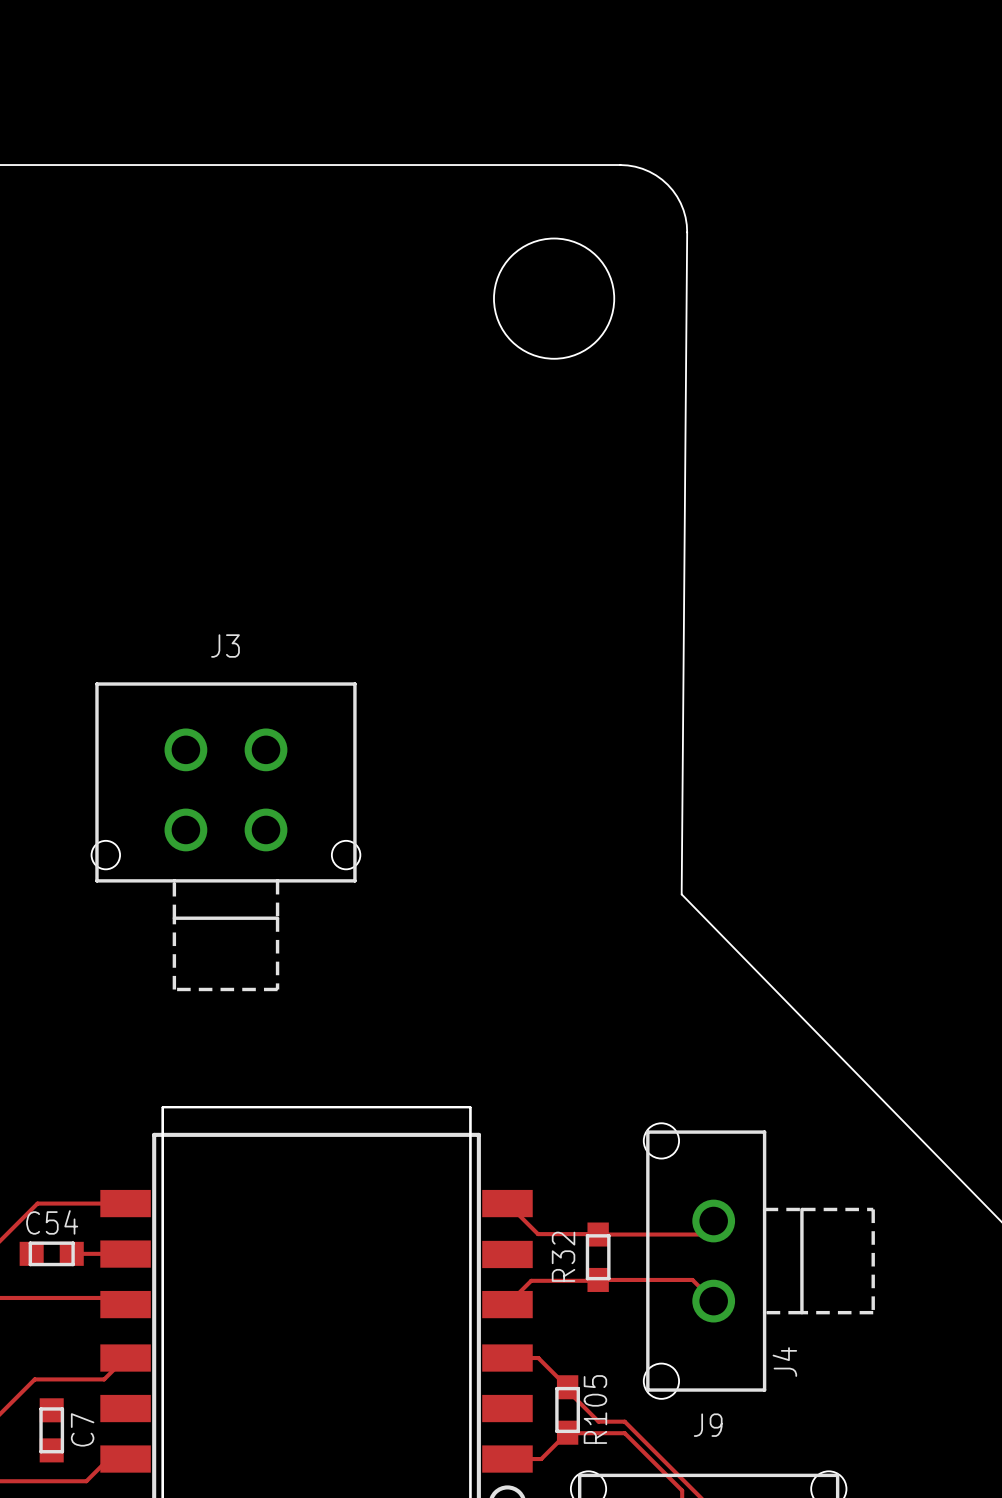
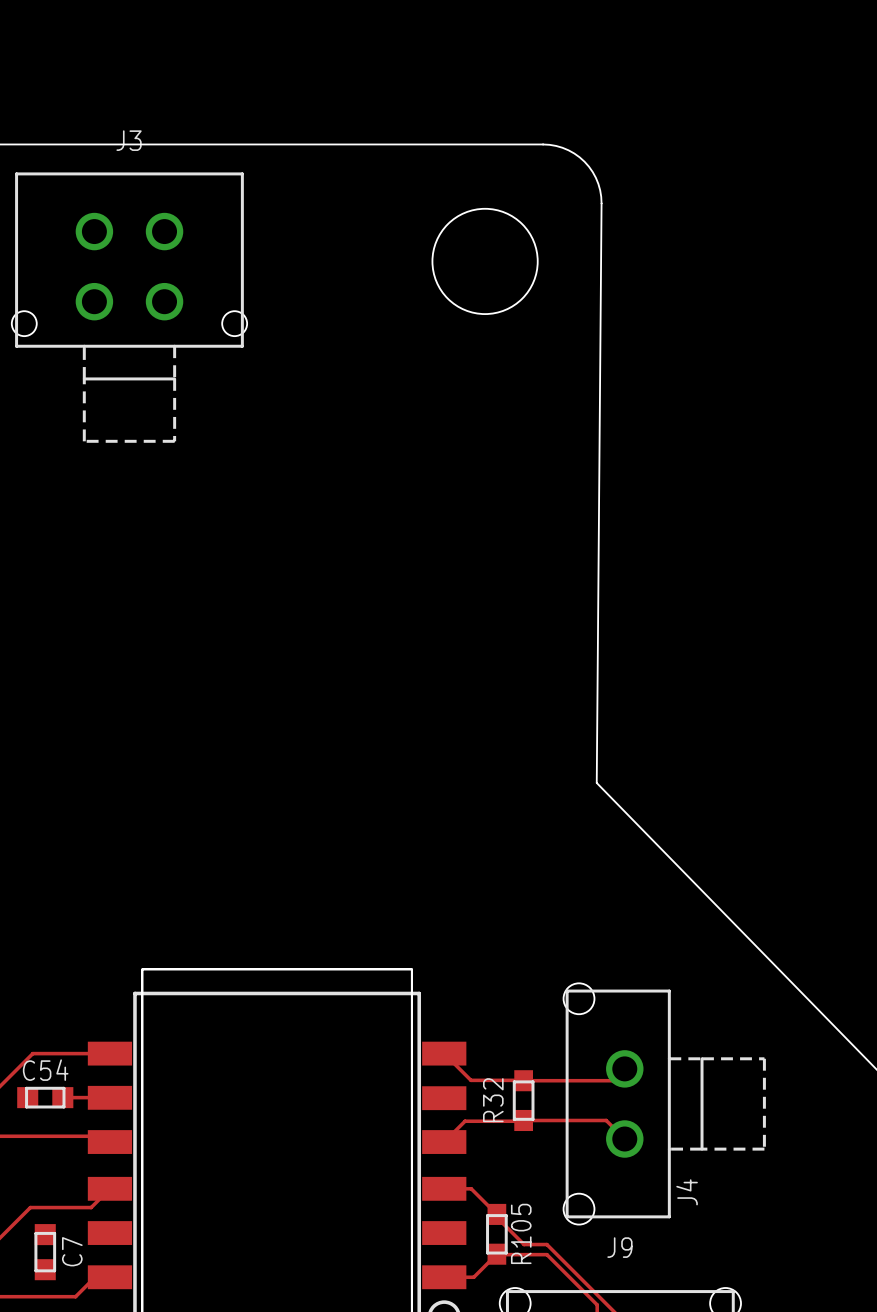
J3 position: (225, 836) -> (129, 307)

